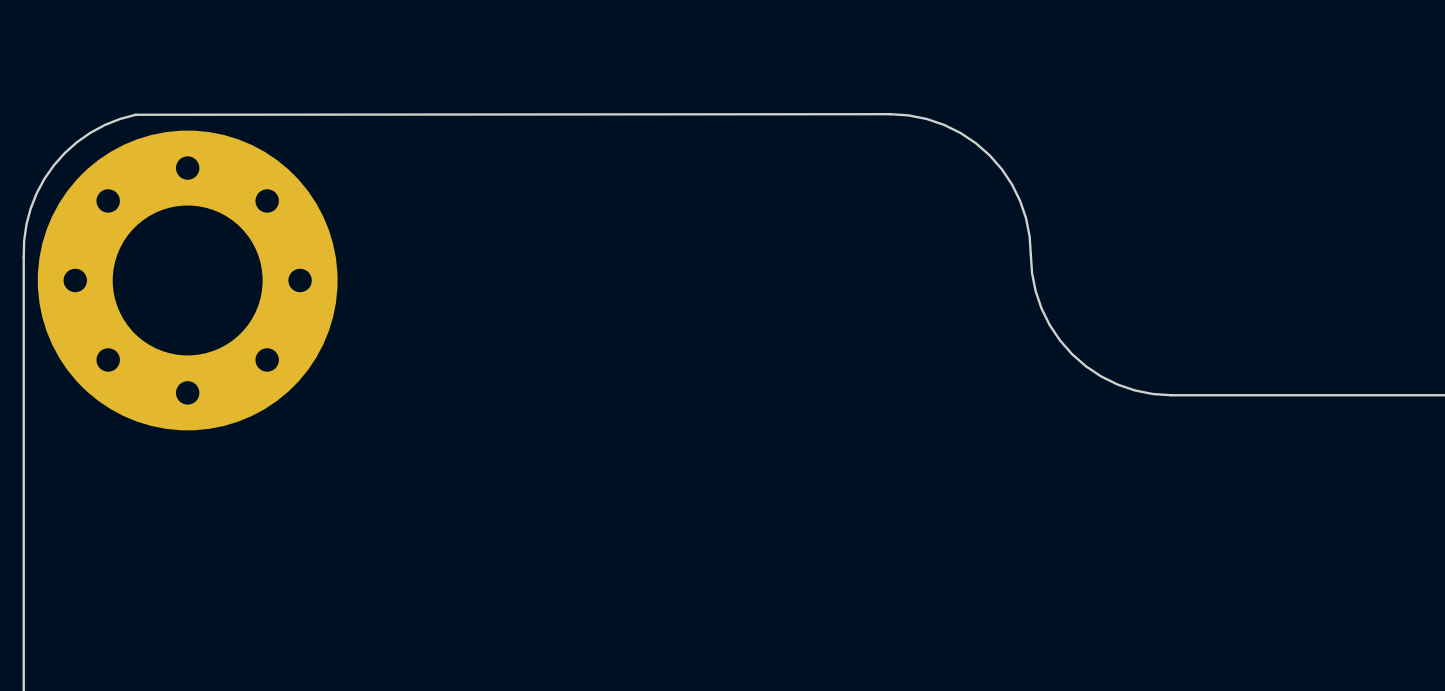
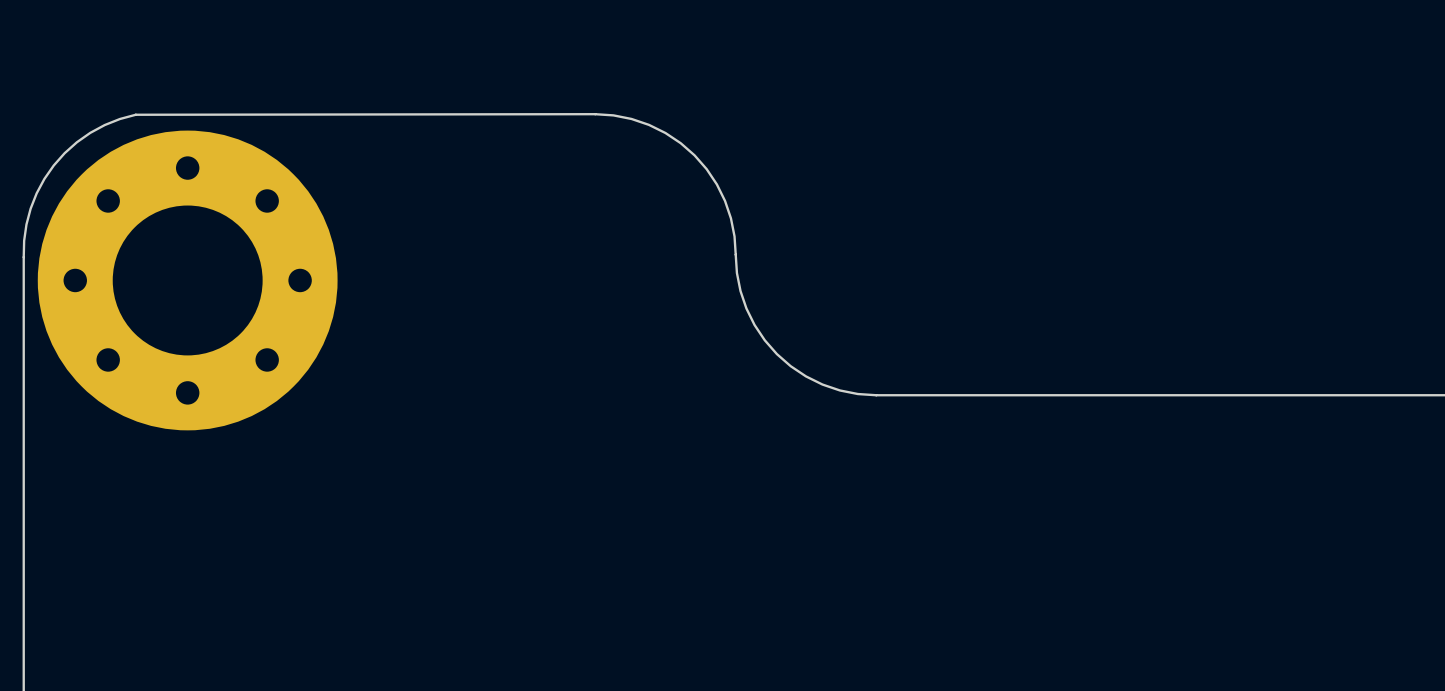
board edge: (135, 114) (890, 114) (926, 118) (944, 124) (975, 143) (1001, 169) (1012, 184) (1026, 218) (1029, 236) (1032, 273) (1041, 308) (1059, 340) (1071, 354) (1085, 366) (1117, 384) (1153, 394) (1171, 395) -> (135, 114) (595, 114) (631, 118) (665, 133) (680, 143) (706, 169) (725, 200) (730, 218) (734, 236) (736, 273) (746, 308) (764, 340) (790, 366) (805, 376) (839, 390) (876, 395) (1171, 395)

